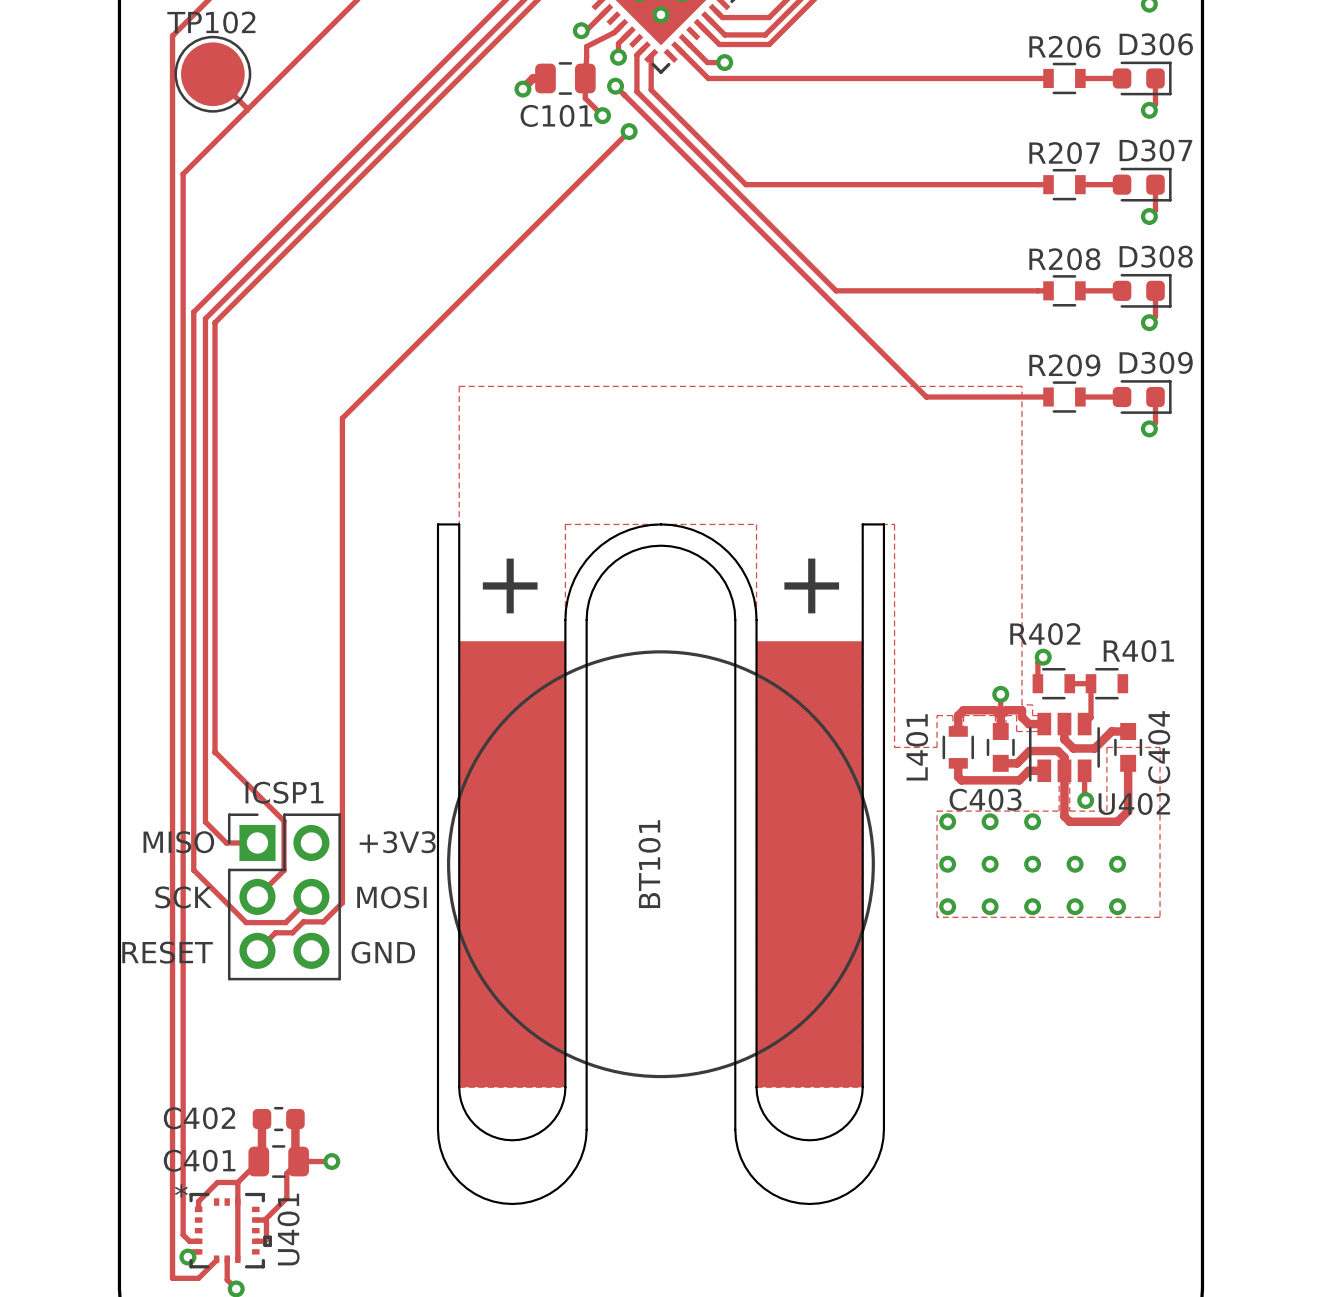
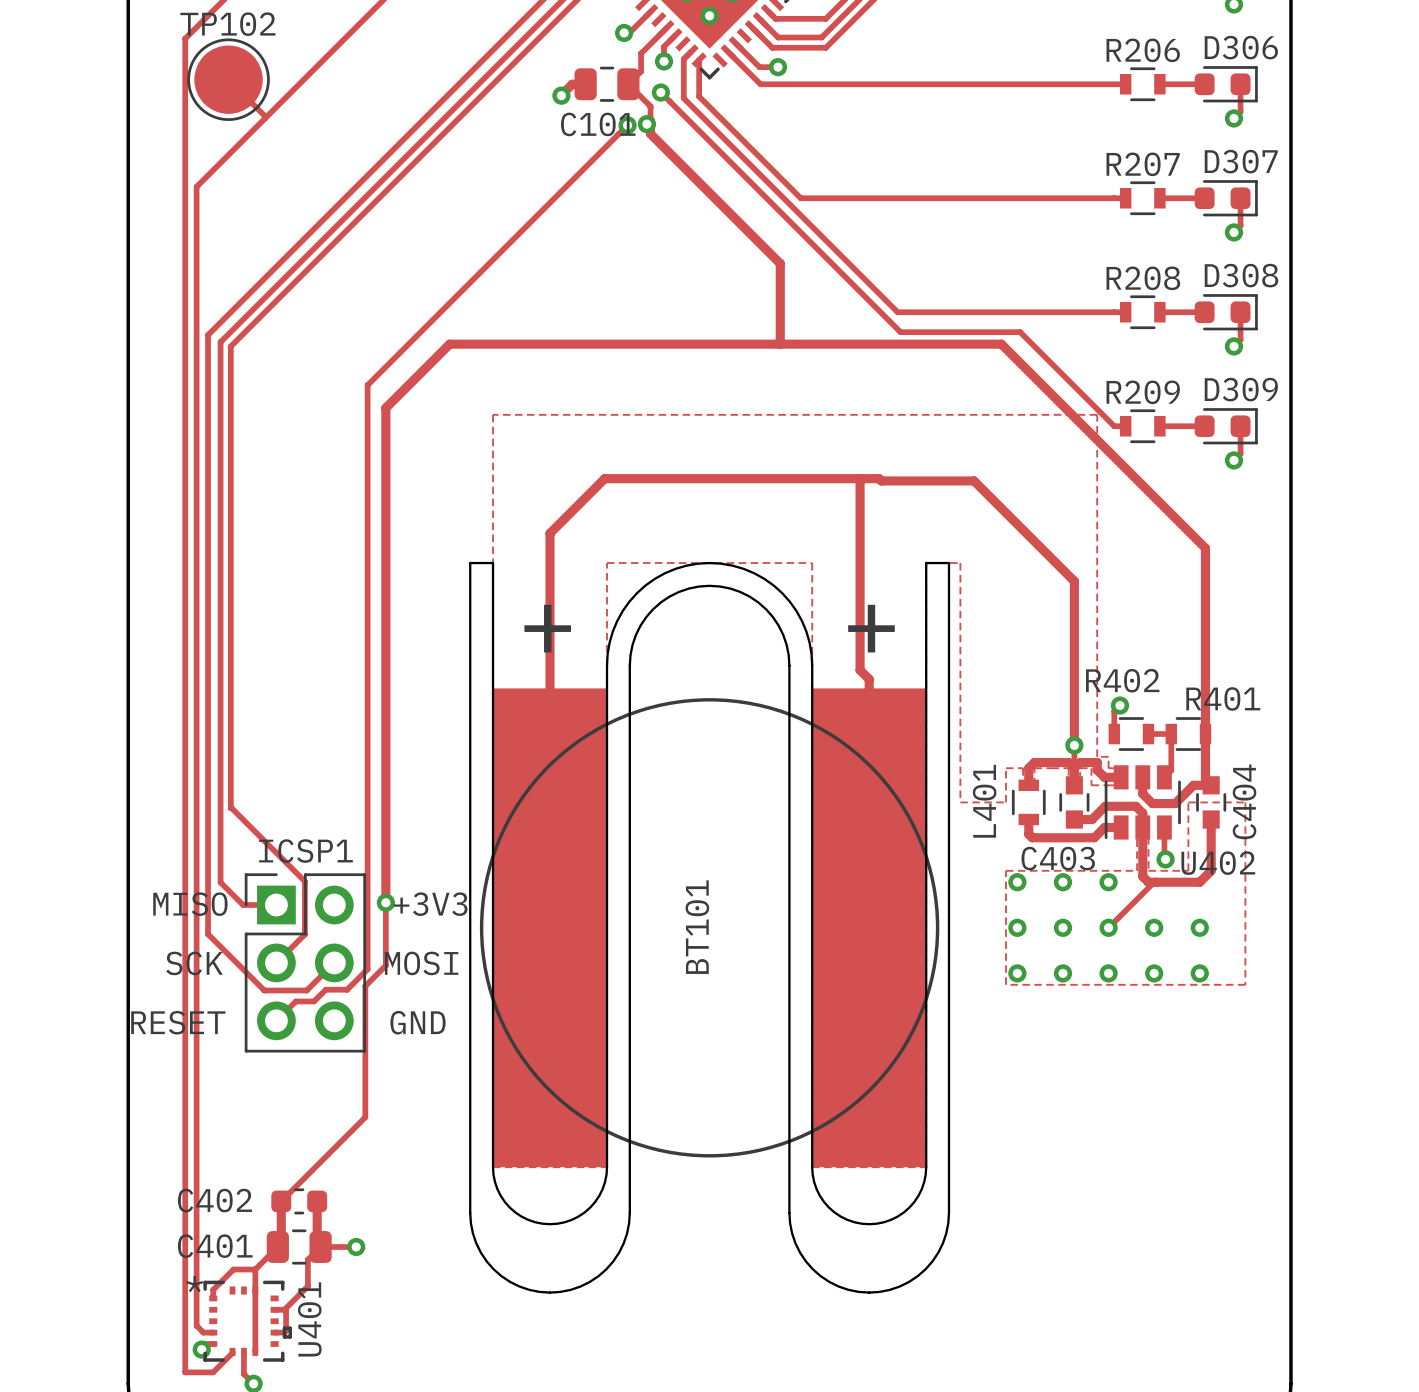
track: (614, 32) (586, 46) (585, 98) (602, 115) -> (659, 34) (641, 53) (641, 71) (628, 84) (650, 106) (650, 133) (780, 263) (780, 344)
track: (629, 131) (342, 418) -> (627, 125) (367, 385) (367, 449)
via position: (629, 131) -> (627, 125)
track: (838, 309) (926, 397) (1037, 397) -> (900, 332) (1020, 332) (1114, 426)
track: none -> (860, 478) (860, 670) (869, 679) (869, 927)
track: none -> (1074, 745) (1074, 581) (974, 480) (881, 480) (879, 478) (604, 478) (550, 533) (550, 927)
track: none -> (1211, 785) (1205, 779) (1205, 548) (1001, 344) (449, 344) (385, 408) (385, 965) (365, 986) (365, 1117) (281, 1201)
track: none -> (1156, 882) (1154, 882) (1108, 927)
via: none -> (385, 902)

